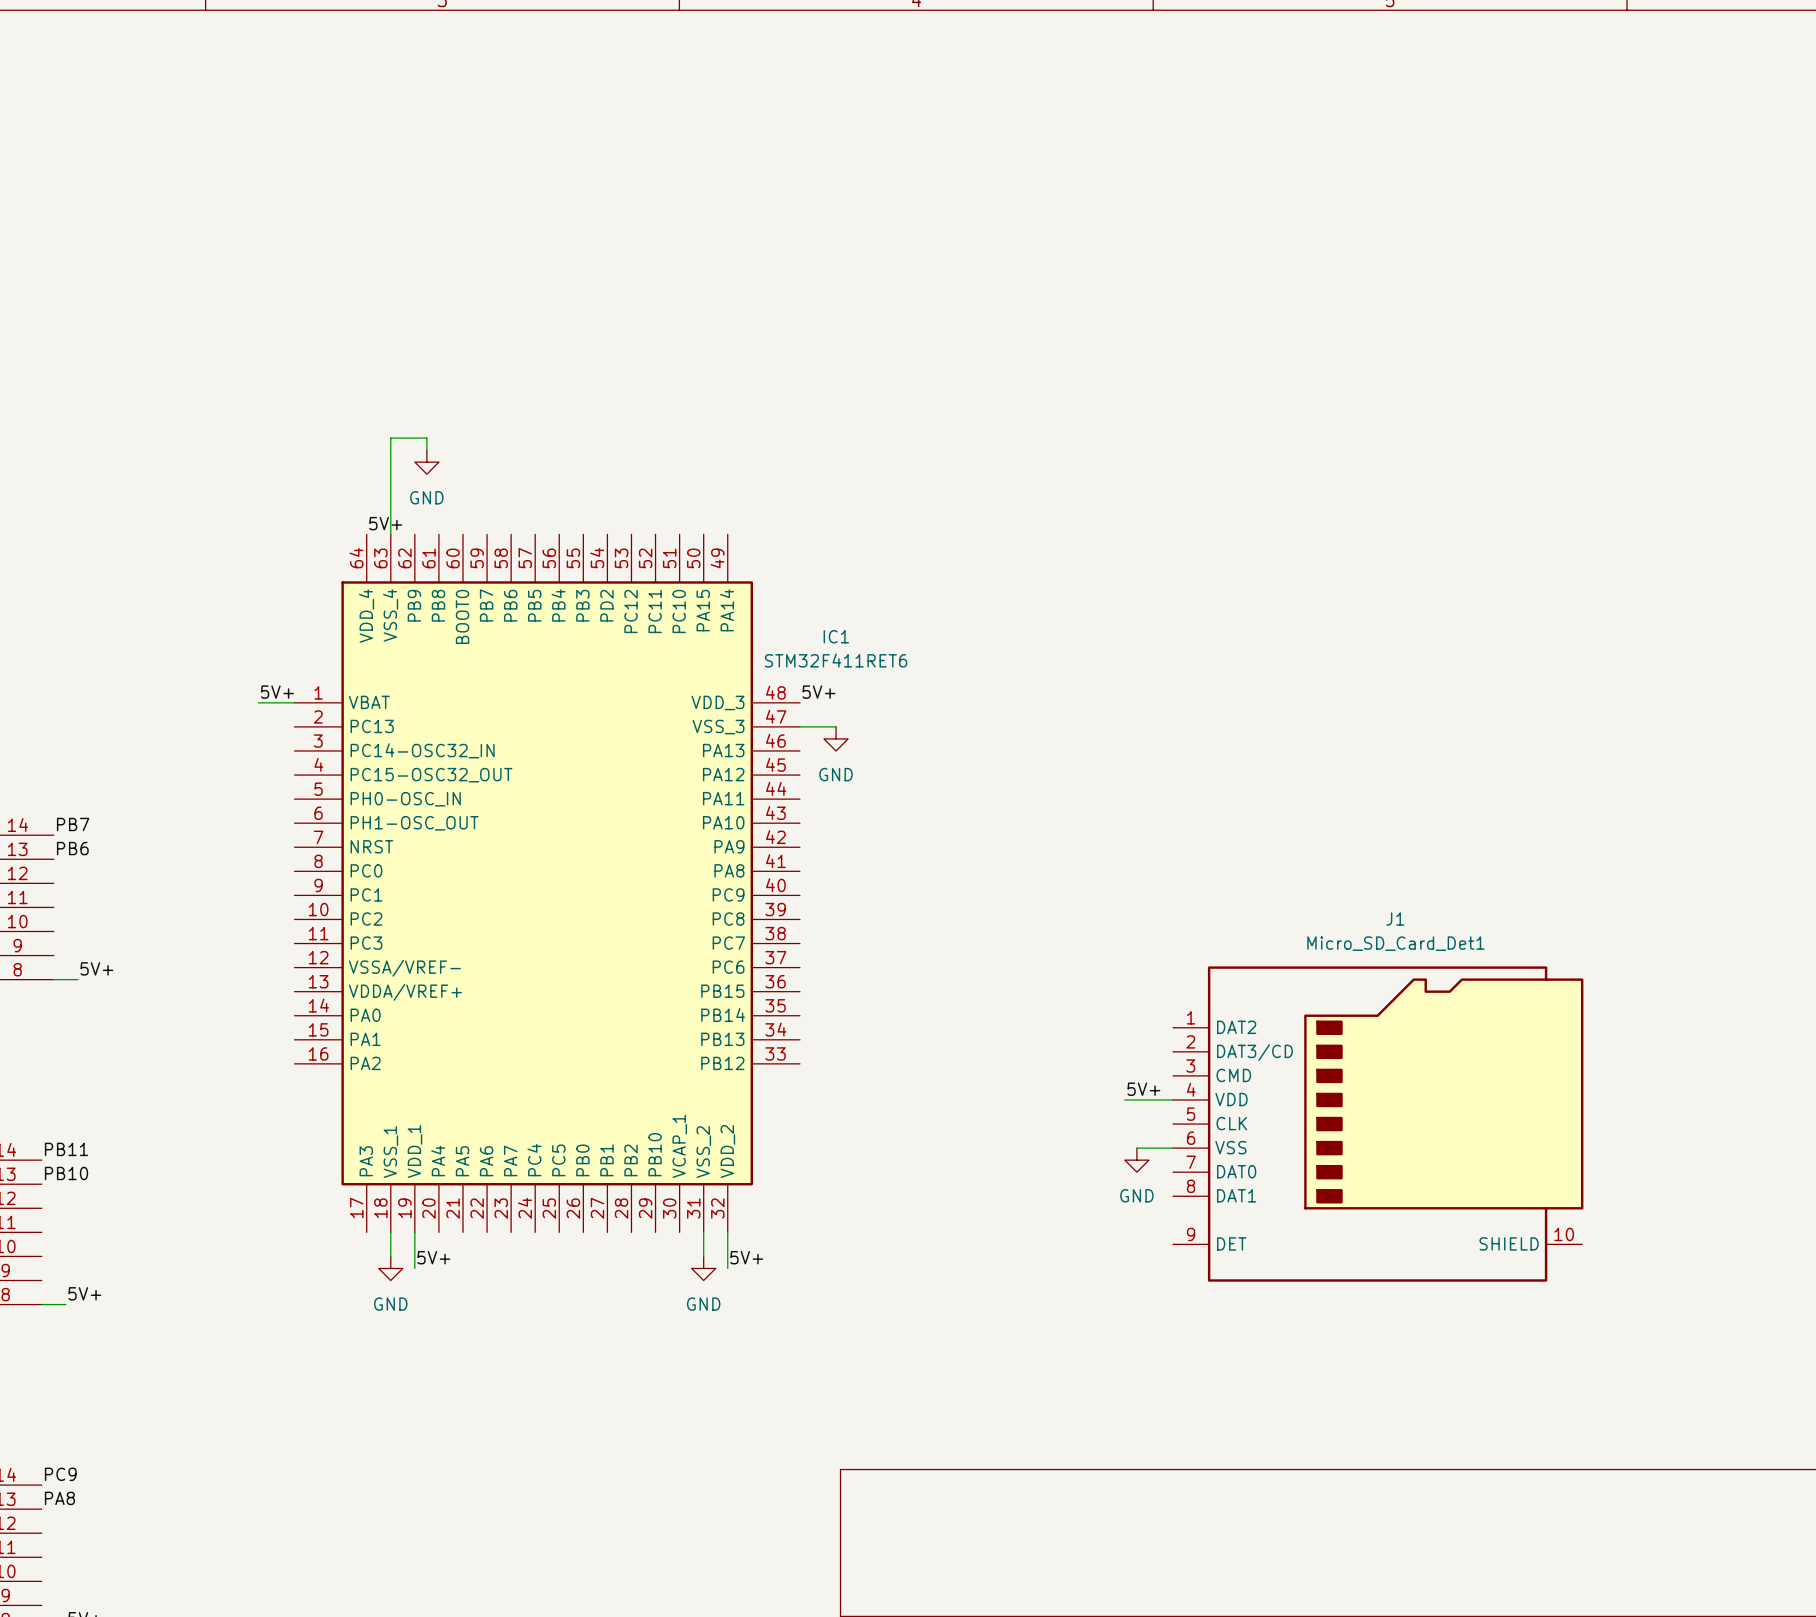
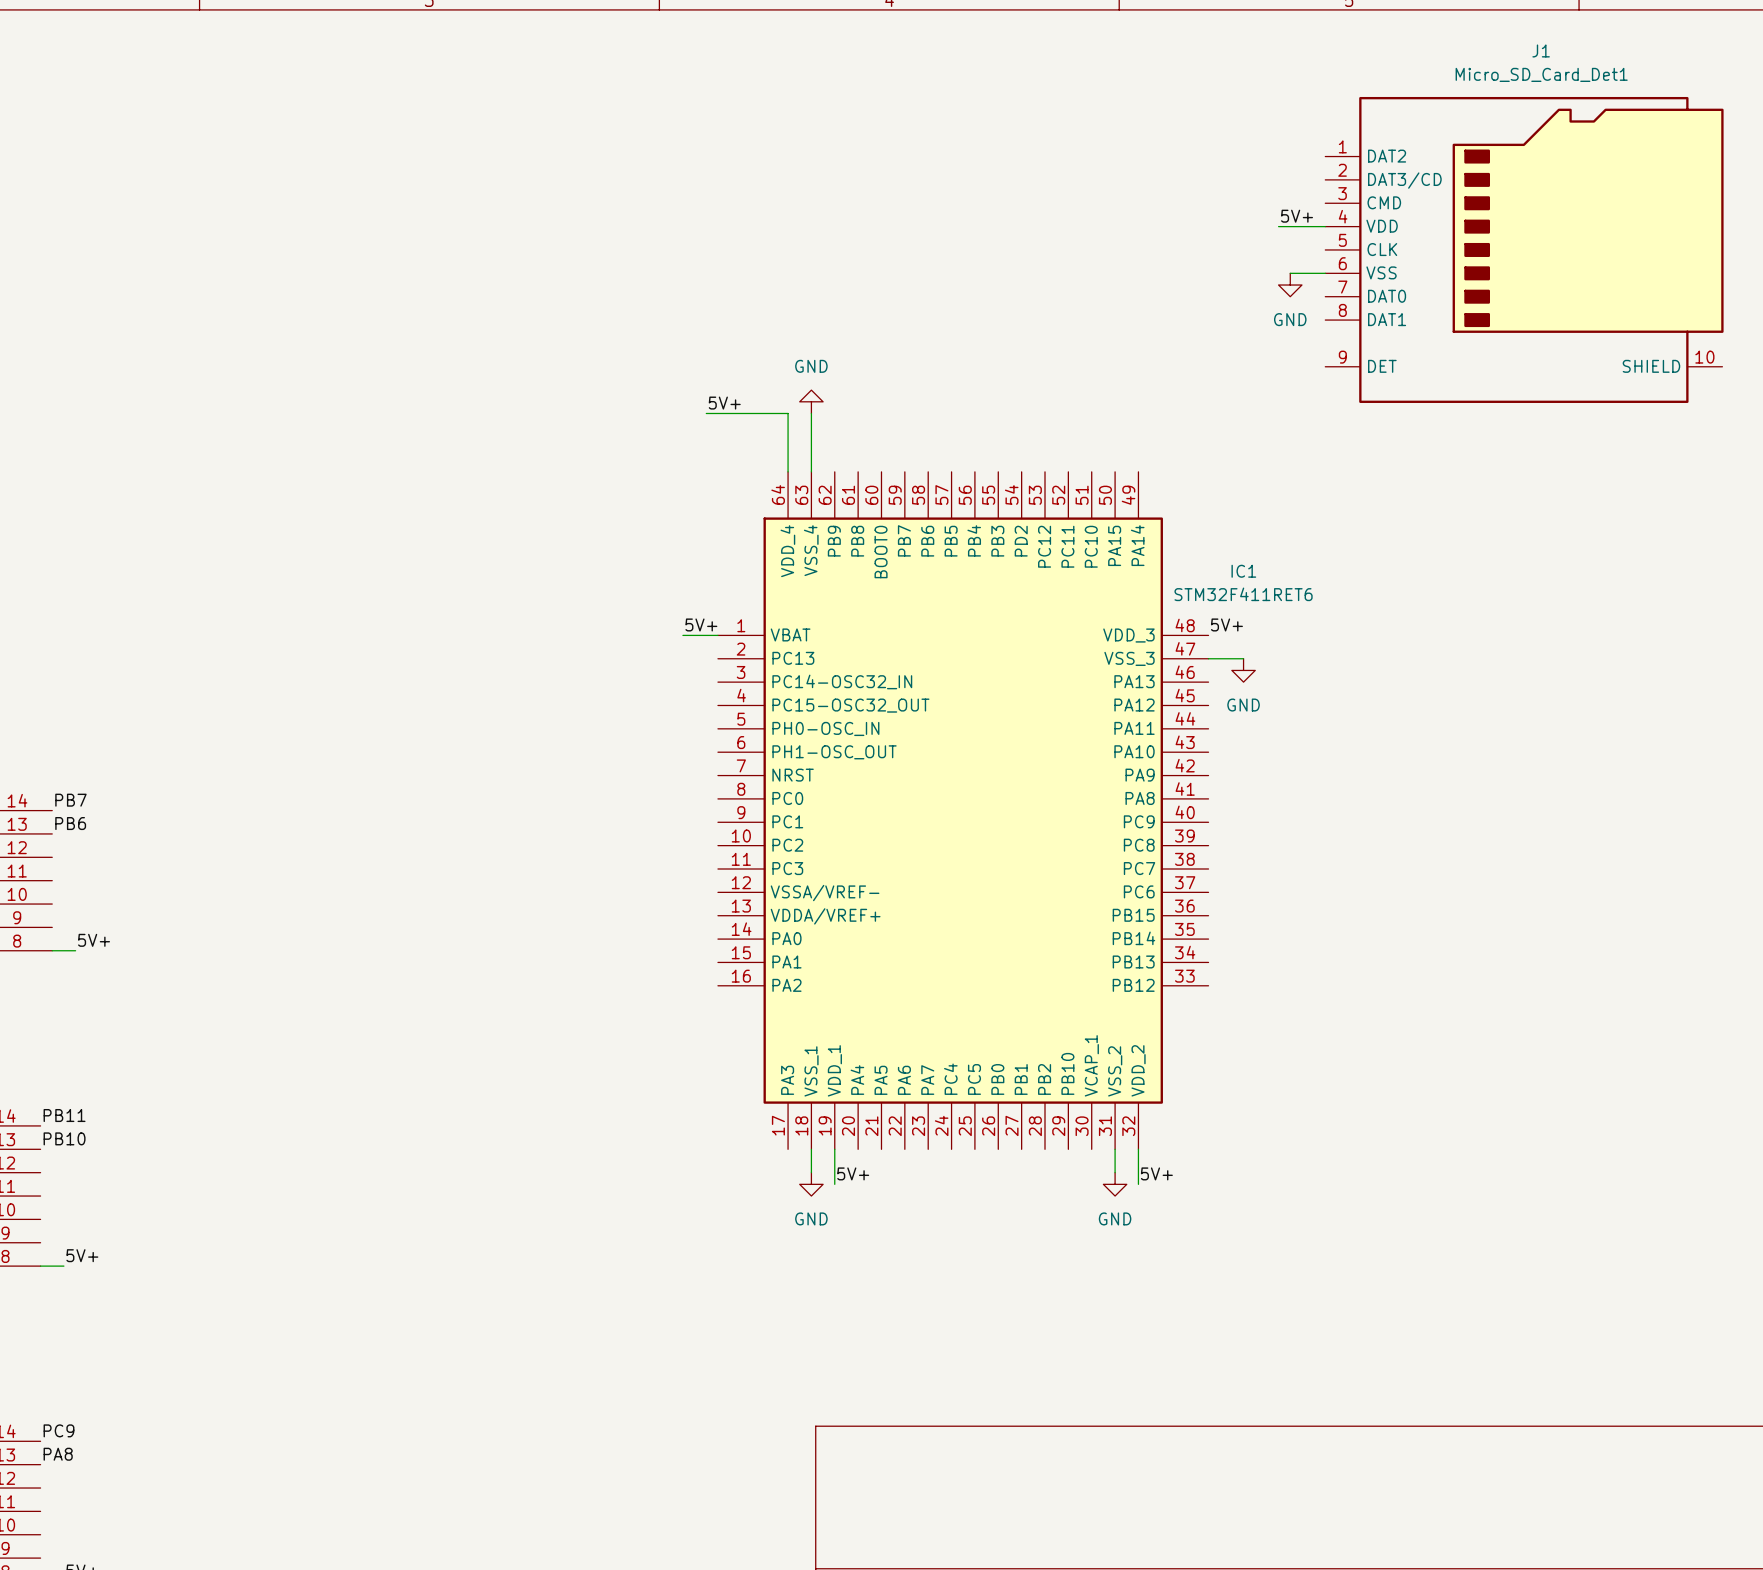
label: none -> 5V+ (1297, 216)
wire: none -> (1278, 226) (1325, 226)
wire: none -> (1290, 273) (1325, 273)
power symbol: none -> GND (1290, 285)
power symbol: none -> GND (811, 401)
label: none -> 5V+ (724, 403)
wire: none -> (706, 413) (788, 413) (788, 471)
wire: none -> (811, 413) (811, 471)
wire: (426, 450) (426, 438) (390, 438) (390, 534) -> none
power symbol: GND (426, 462) -> none
label: 5V+ (385, 523) -> none
label: none -> 5V+ (1226, 624)
wire: none -> (1208, 658) (1243, 658)
power symbol: none -> GND (1243, 670)
label: 5V+ (277, 692) -> none
label position: 5V+ (818, 692) -> 5V+ (701, 624)
wire: (258, 702) (294, 702) -> none
power symbol: GND (836, 738) -> none
IC1 position: (547, 883) -> (963, 810)
label position: 5V+ (1143, 1089) -> 5V+ (1156, 1173)
J1 position: (1378, 1124) -> (1524, 249)
wire: (1136, 1148) (1173, 1148) -> none
power symbol position: GND (1136, 1160) -> GND (1115, 1184)
wire: none -> (1115, 1149) (1115, 1172)
wire: none -> (1138, 1149) (1138, 1184)
wire: (390, 1232) (390, 1256) -> none
wire: (414, 1232) (414, 1268) -> none
wire: (703, 1232) (703, 1256) -> (811, 1149) (811, 1172)
wire: (727, 1232) (727, 1268) -> (834, 1149) (834, 1184)
label: 5V+ (433, 1257) -> none
label position: 5V+ (746, 1257) -> 5V+ (853, 1173)
power symbol: GND (390, 1268) -> none
power symbol position: GND (703, 1268) -> GND (811, 1184)

